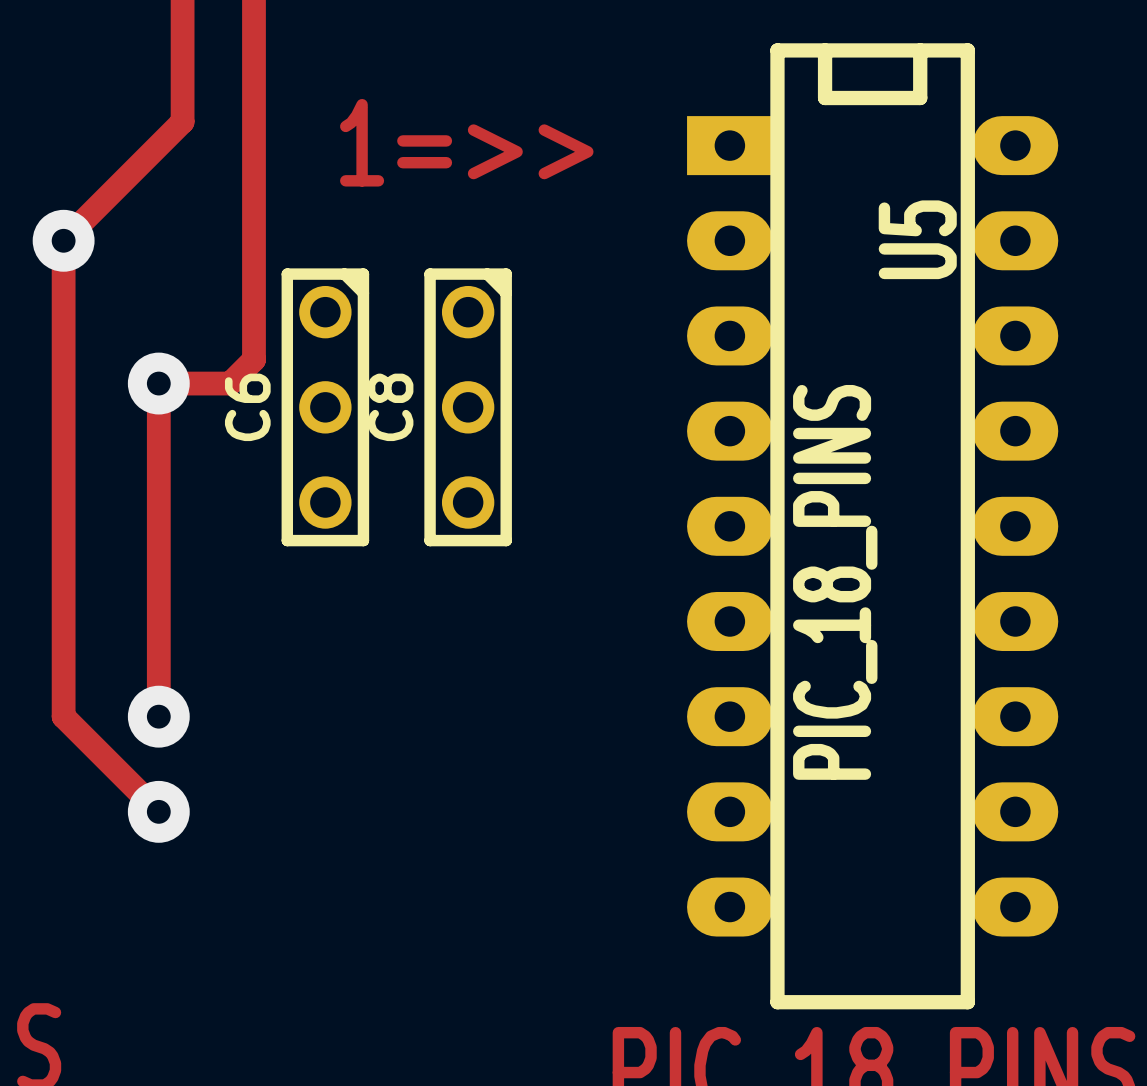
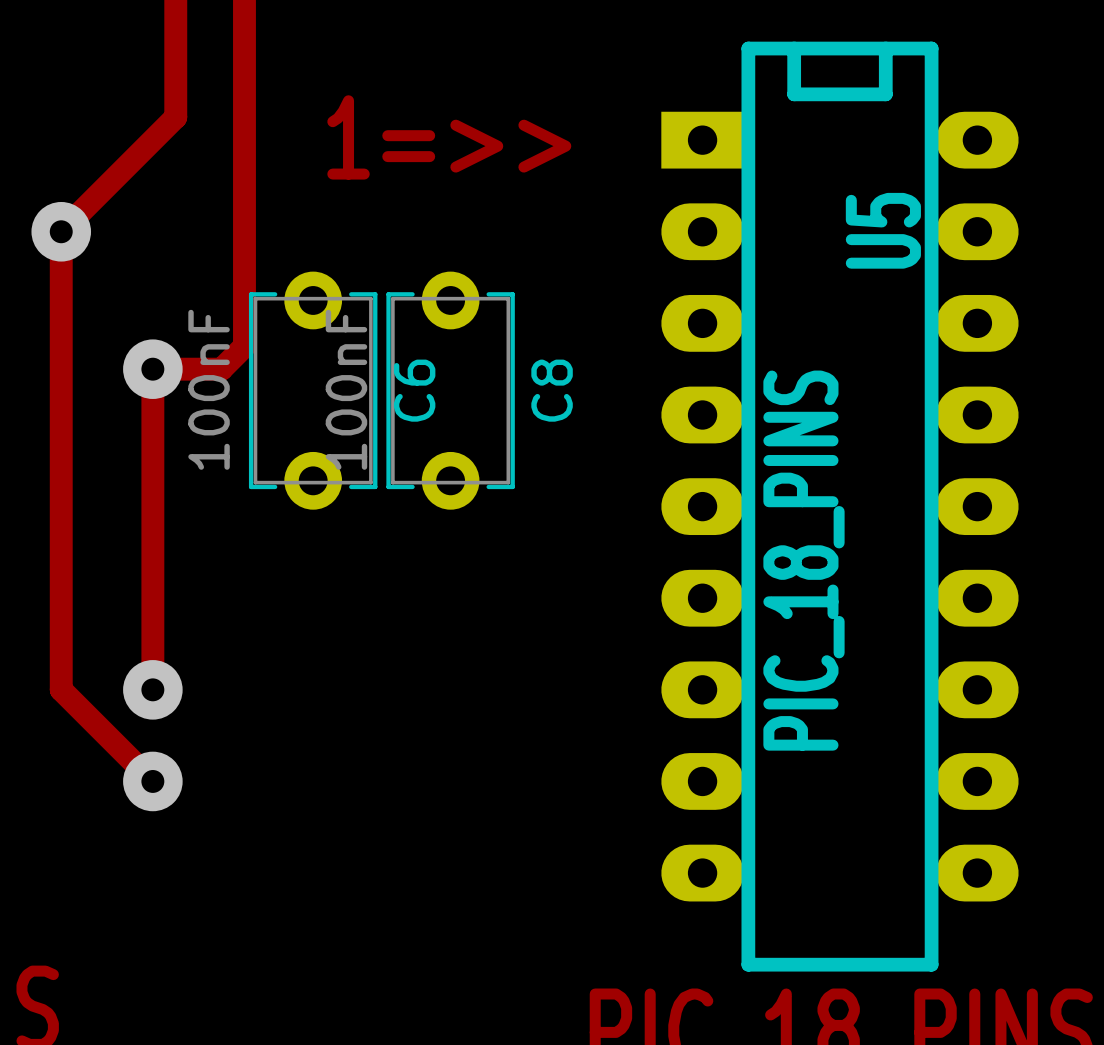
C6 footprint: [281, 268, 370, 547] -> [248, 271, 378, 510]
C8 footprint: [424, 268, 512, 547] -> [386, 271, 515, 510]
C6 value: none -> 100nF (209, 389)
C8 value: none -> 100nF (346, 389)
C6 name position: C6 (247, 407) -> C6 (414, 390)
C8 name position: C8 (390, 407) -> C8 (552, 390)

